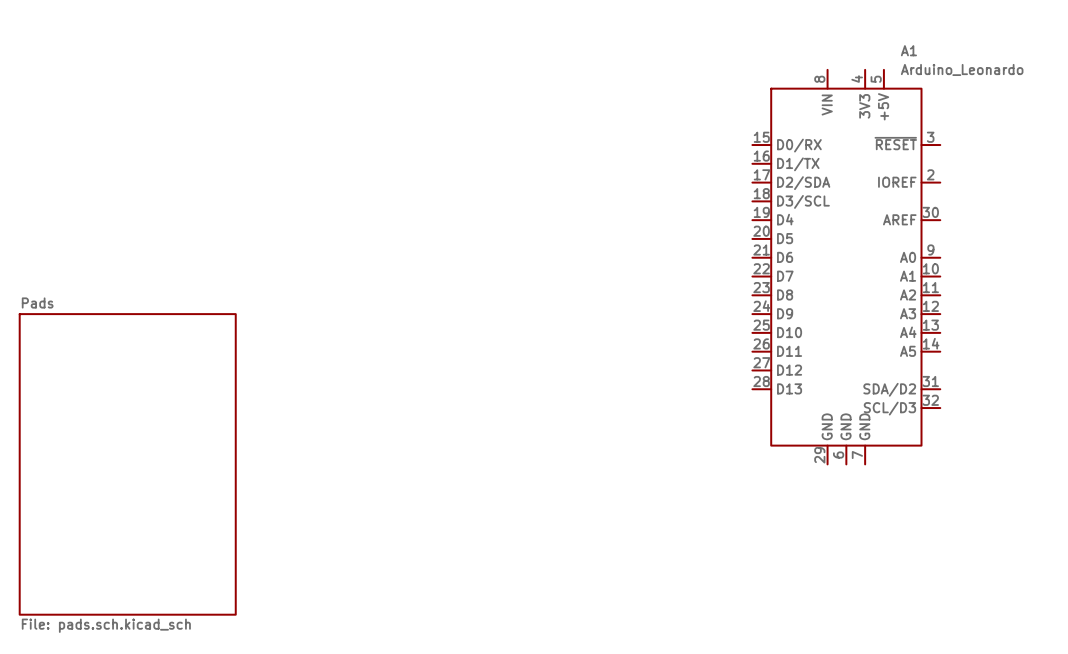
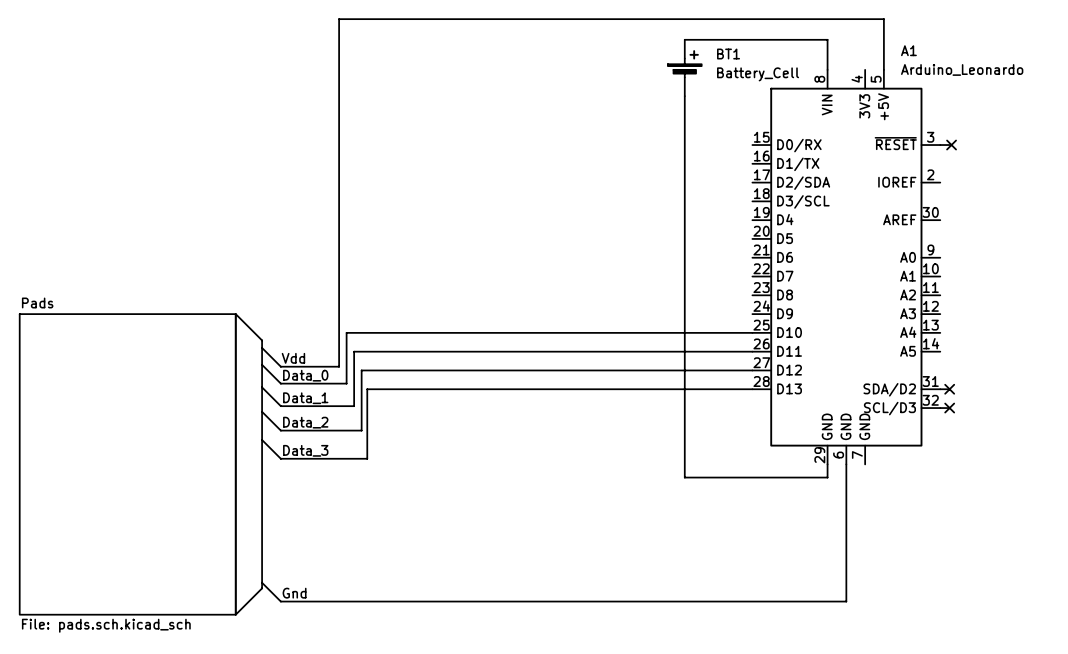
wire: none -> (684, 39) (827, 39) (827, 69)
BT1: none -> Battery_Cell (684, 67)
wire: none -> (883, 69) (883, 19) (339, 19) (339, 366) (280, 366) (262, 347)
wire: none -> (684, 96) (684, 477) (827, 477) (827, 464)
wire: none -> (940, 145) (951, 145)
no-connect mark: none -> (951, 145)
bus: none -> (235, 314) (235, 614) (262, 588) (262, 340) (235, 314)
wire: none -> (752, 332) (346, 332) (346, 383) (280, 383) (262, 364)
wire: none -> (752, 351) (354, 351) (354, 406) (280, 406) (262, 387)
label: none -> Vdd (293, 358)
wire: none -> (752, 370) (361, 370) (361, 430) (280, 430) (262, 411)
label: none -> Data_0 (305, 375)
wire: none -> (752, 389) (367, 389) (367, 458) (280, 458) (262, 439)
wire: none -> (940, 389) (949, 389)
no-connect mark: none -> (949, 389)
label: none -> Data_1 (305, 398)
wire: none -> (940, 408) (949, 408)
no-connect mark: none -> (949, 408)
label: none -> Data_2 (305, 422)
label: none -> Data_3 (305, 450)
wire: none -> (846, 464) (846, 601) (280, 601) (262, 582)
label: none -> Gnd (294, 593)

